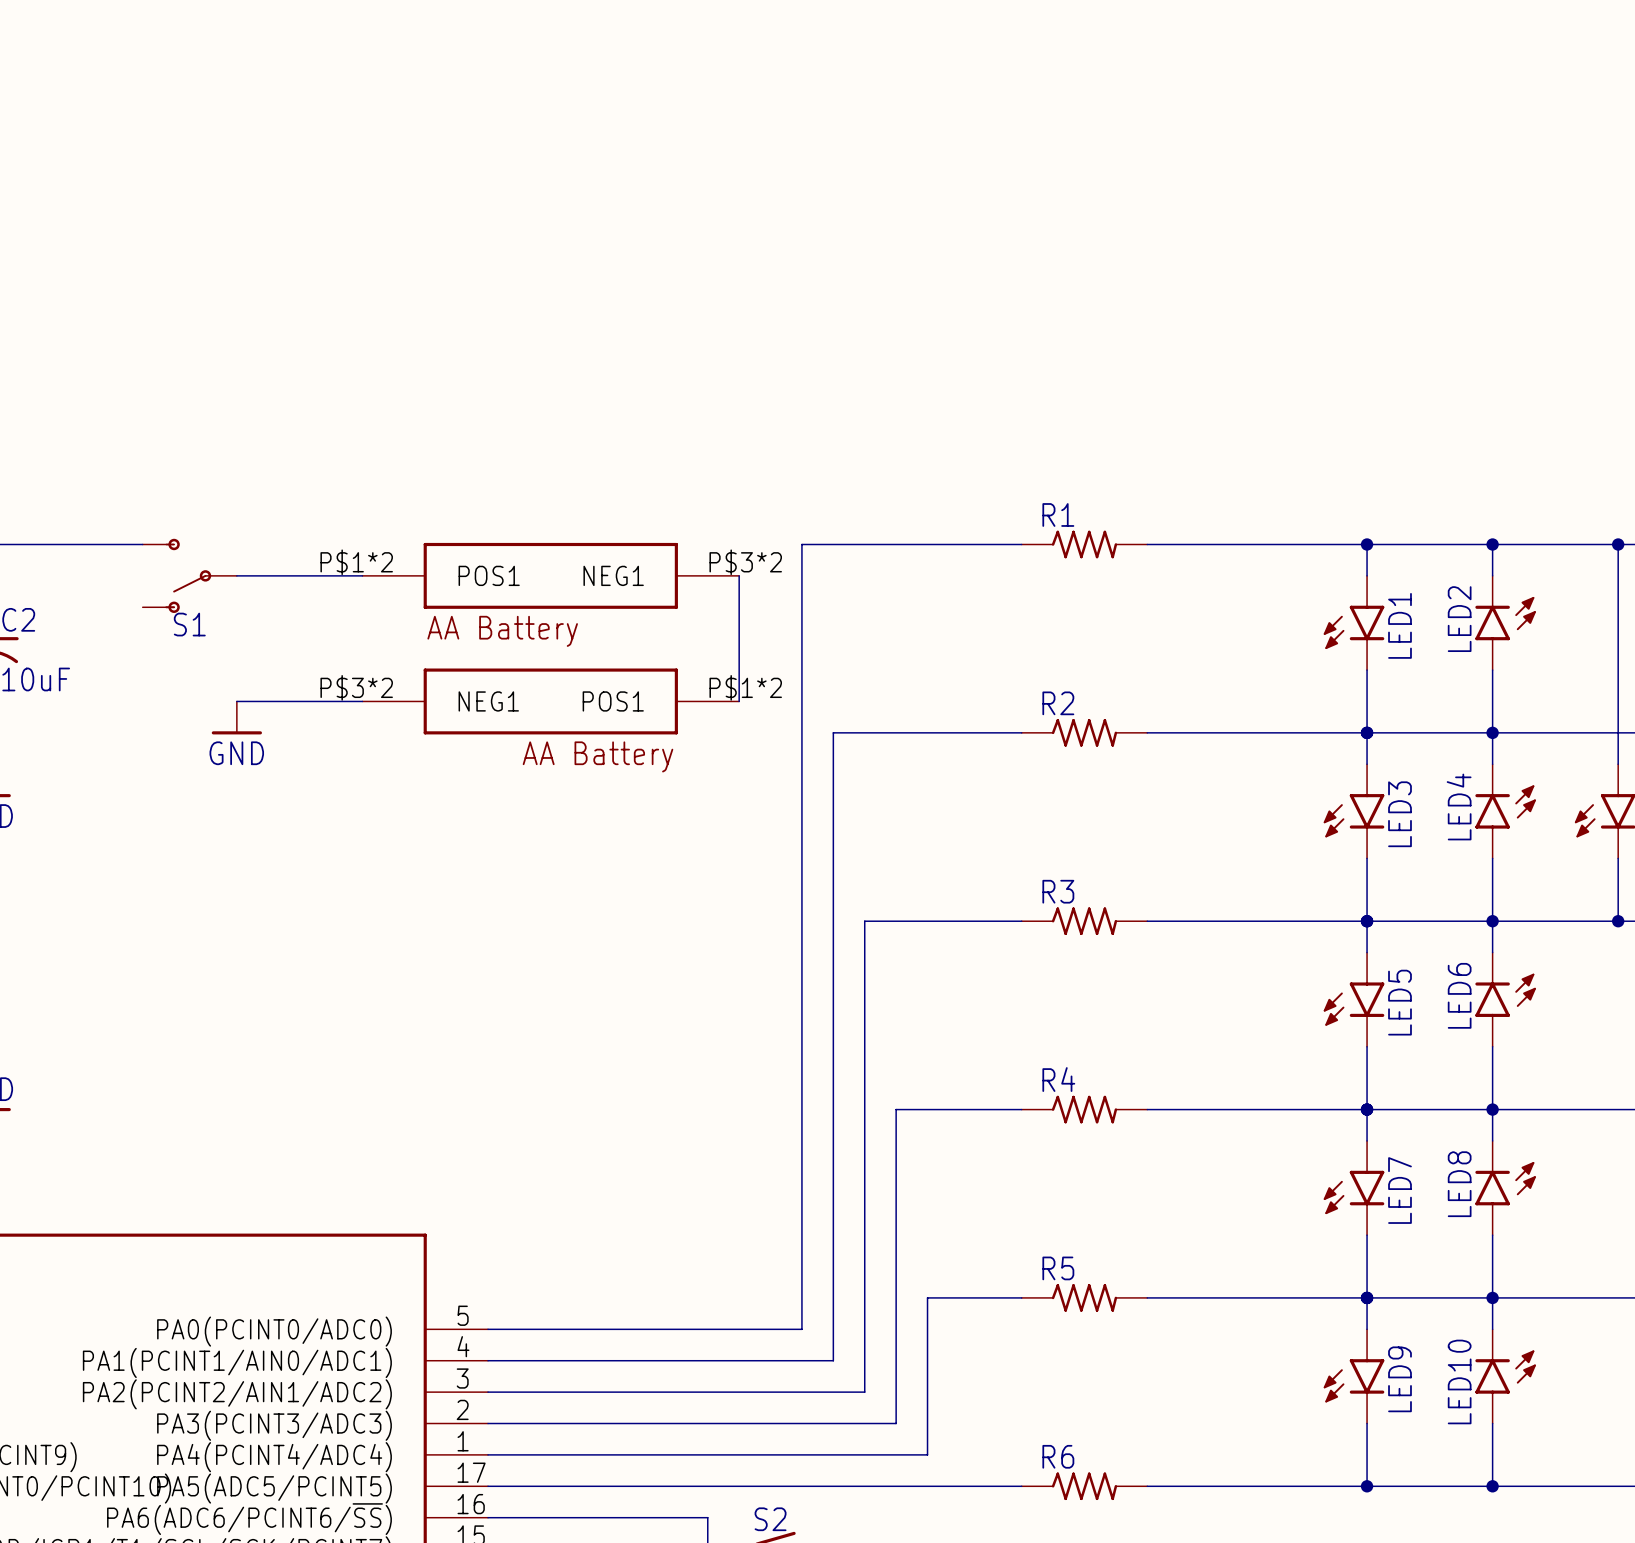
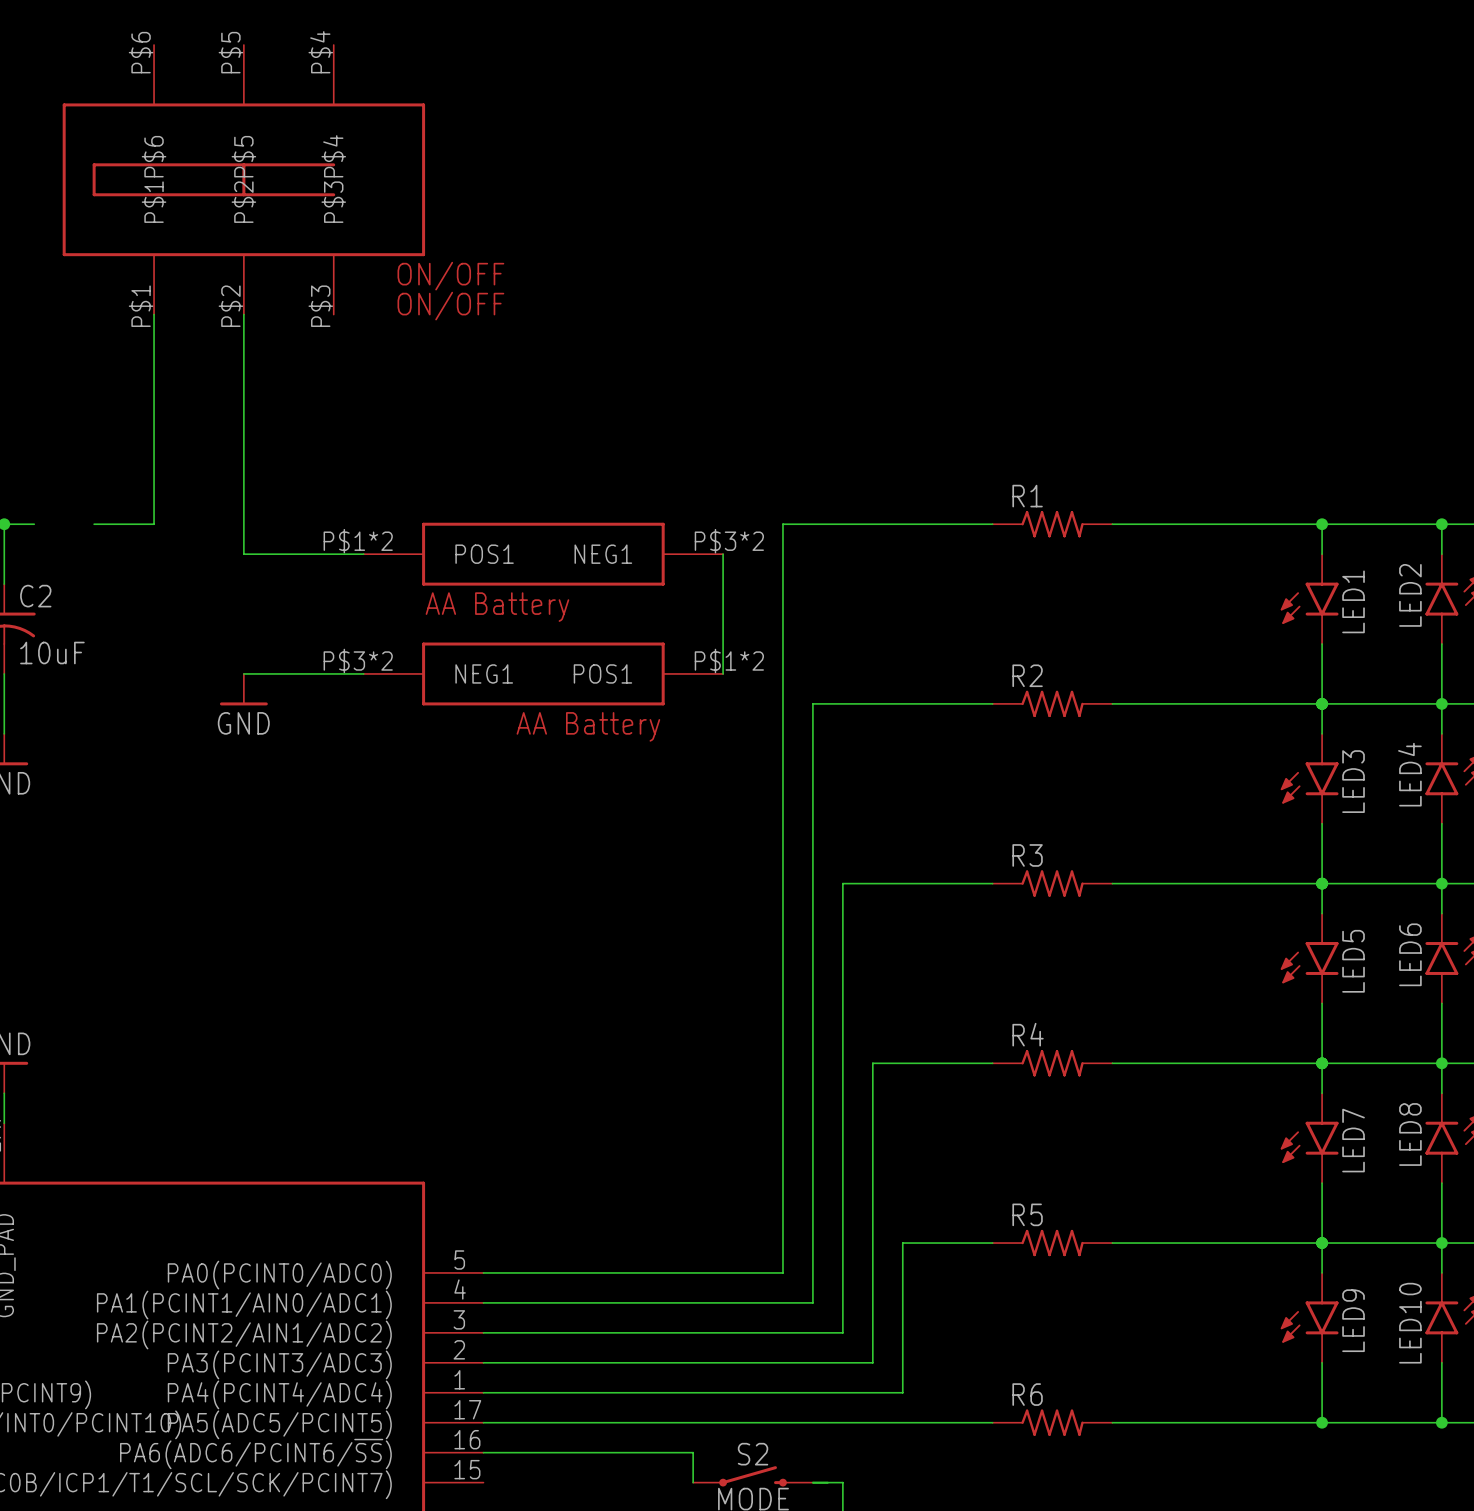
ON/OFF: none -> ON/OFF (243, 179)
wire: none -> (154, 314) (154, 524)
wire: none -> (243, 314) (243, 554)
wire: (17, 544) (79, 544) -> none
S1: (189, 575) -> none

